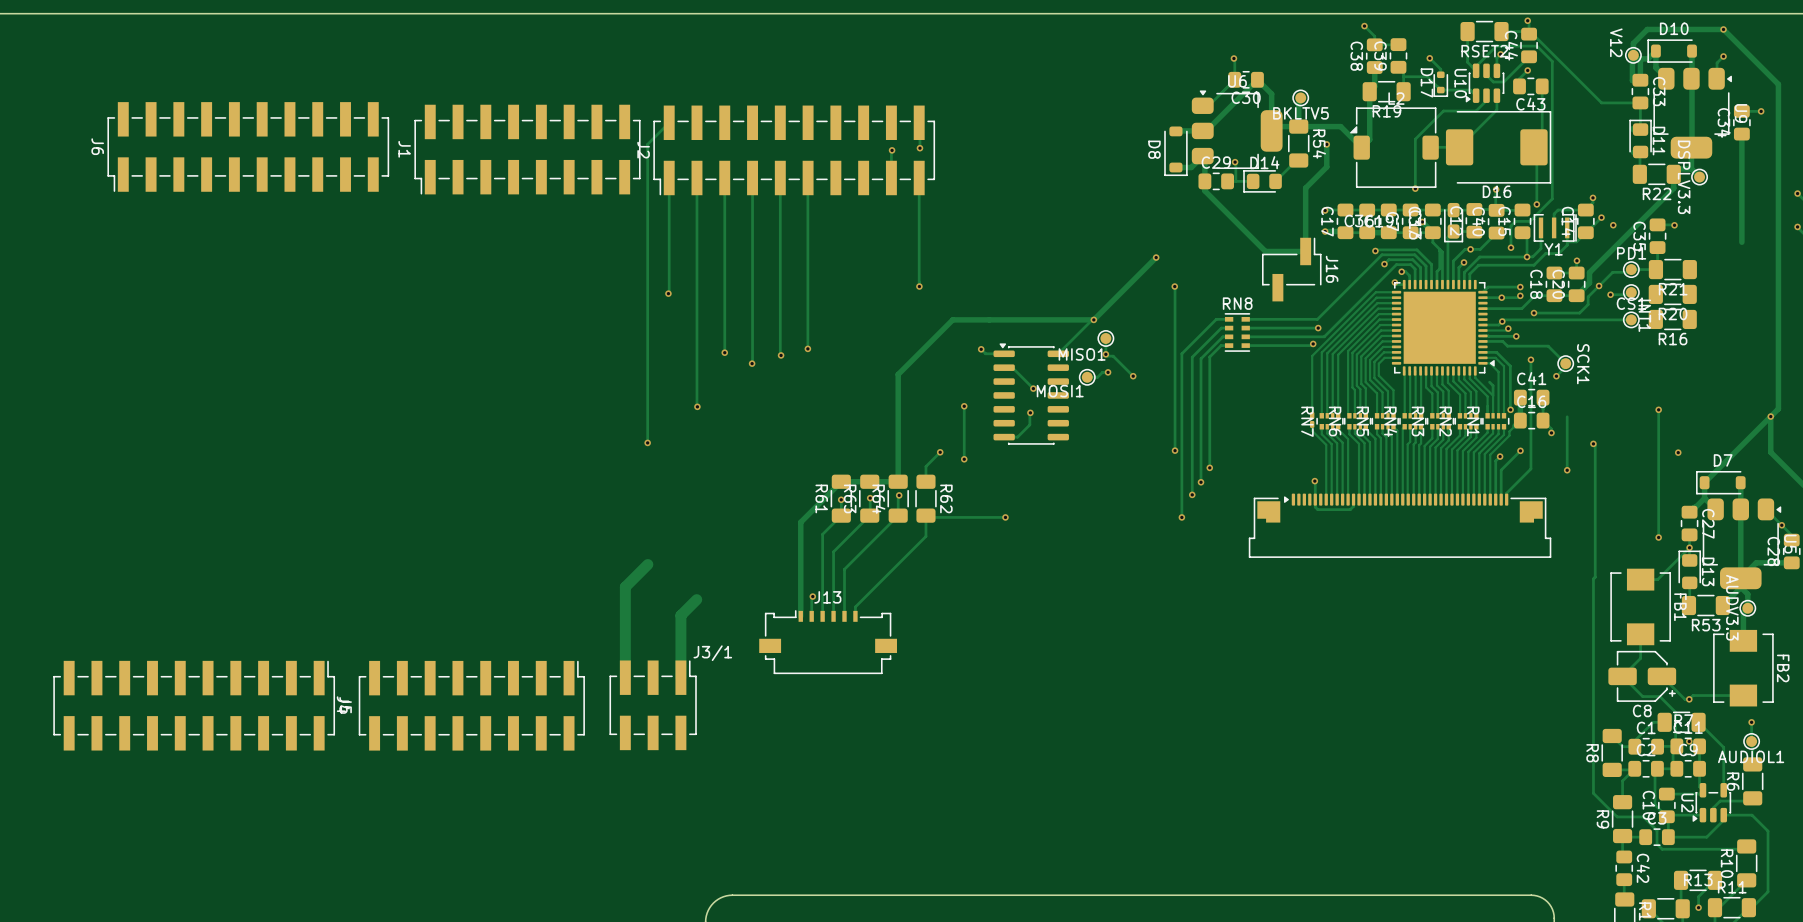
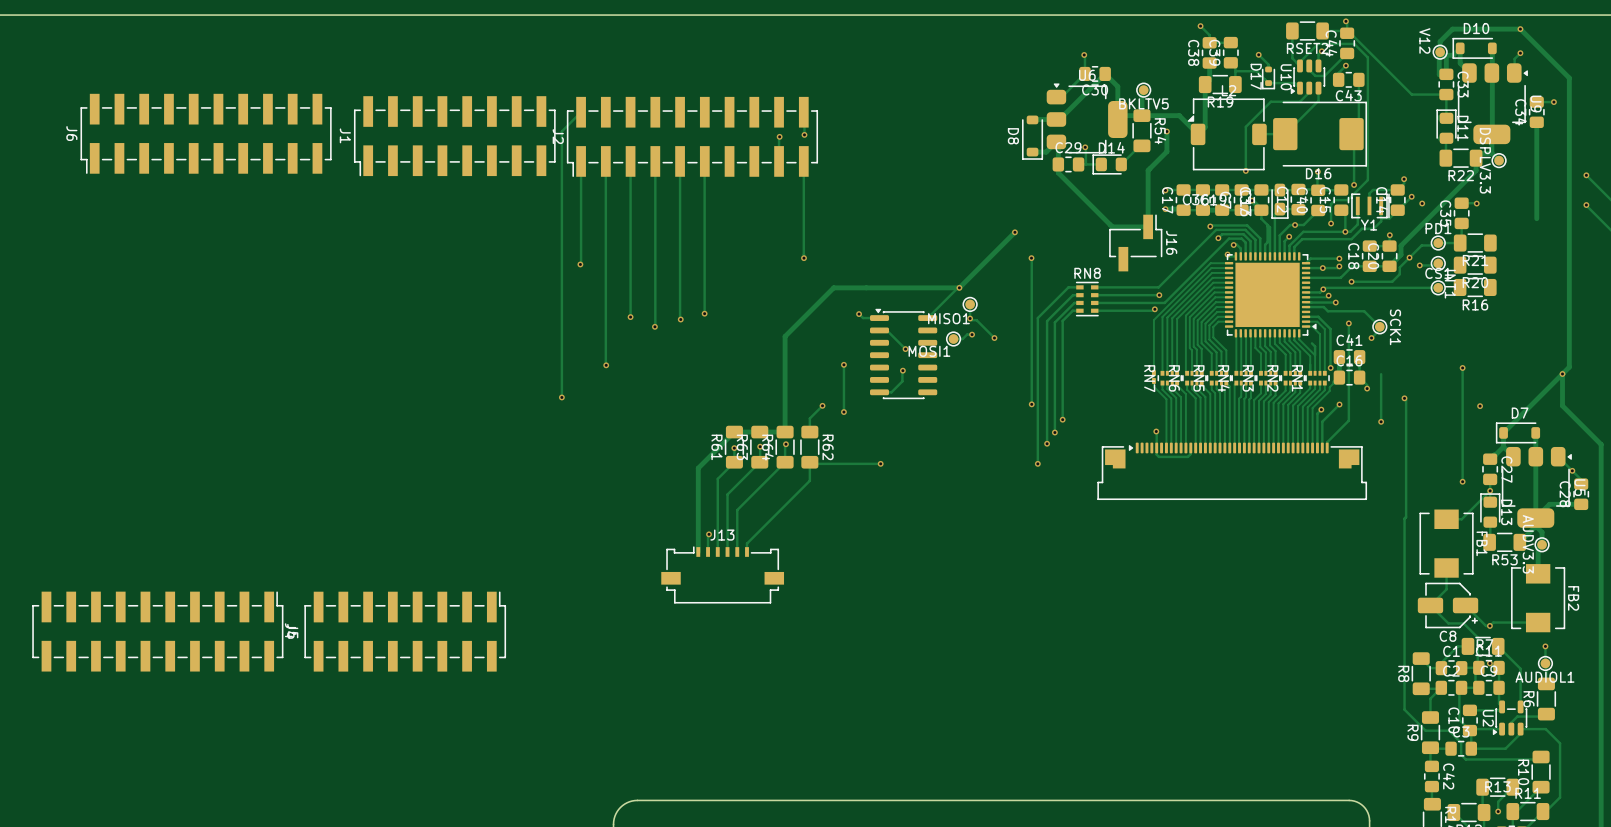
track: (647, 564) (625, 587) (625, 677) -> none
track: (696, 599) (680, 615) (680, 677) -> none
J3/1: (653, 705) -> none

